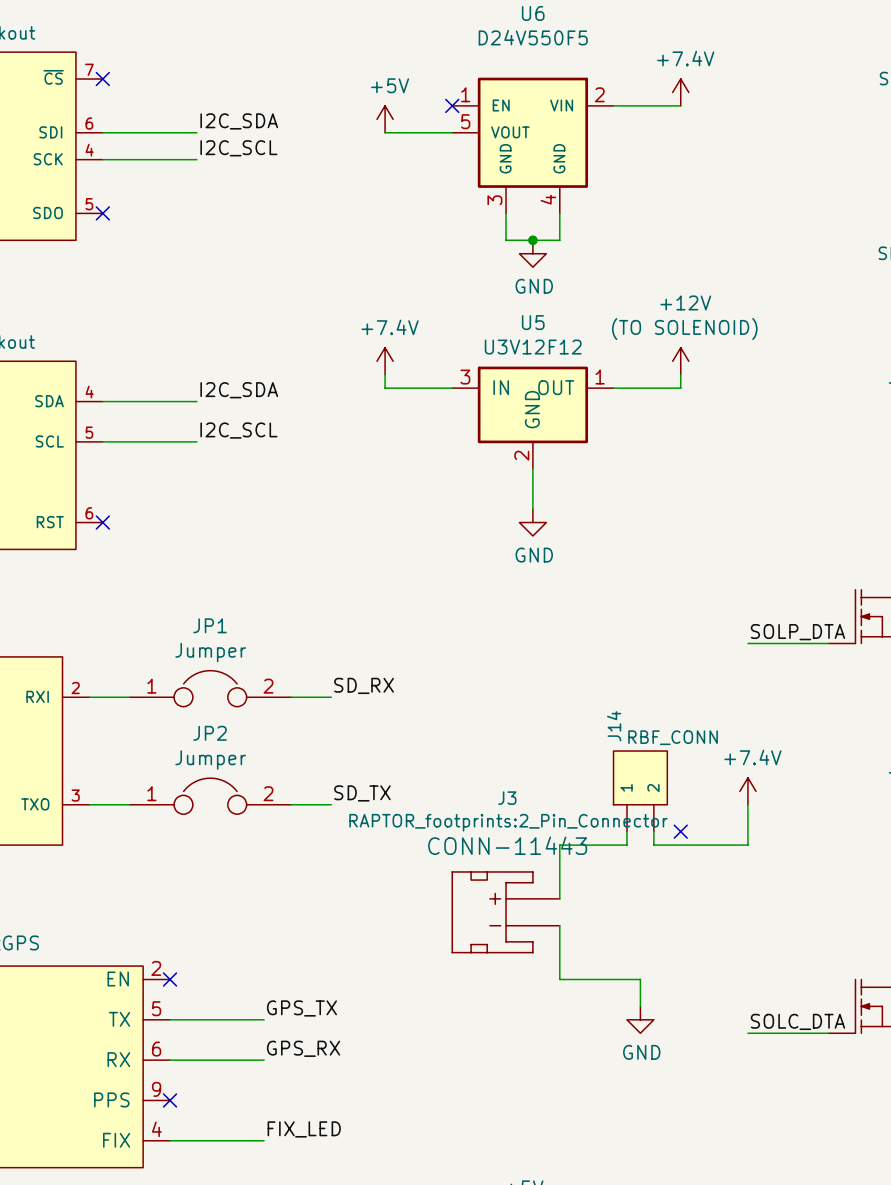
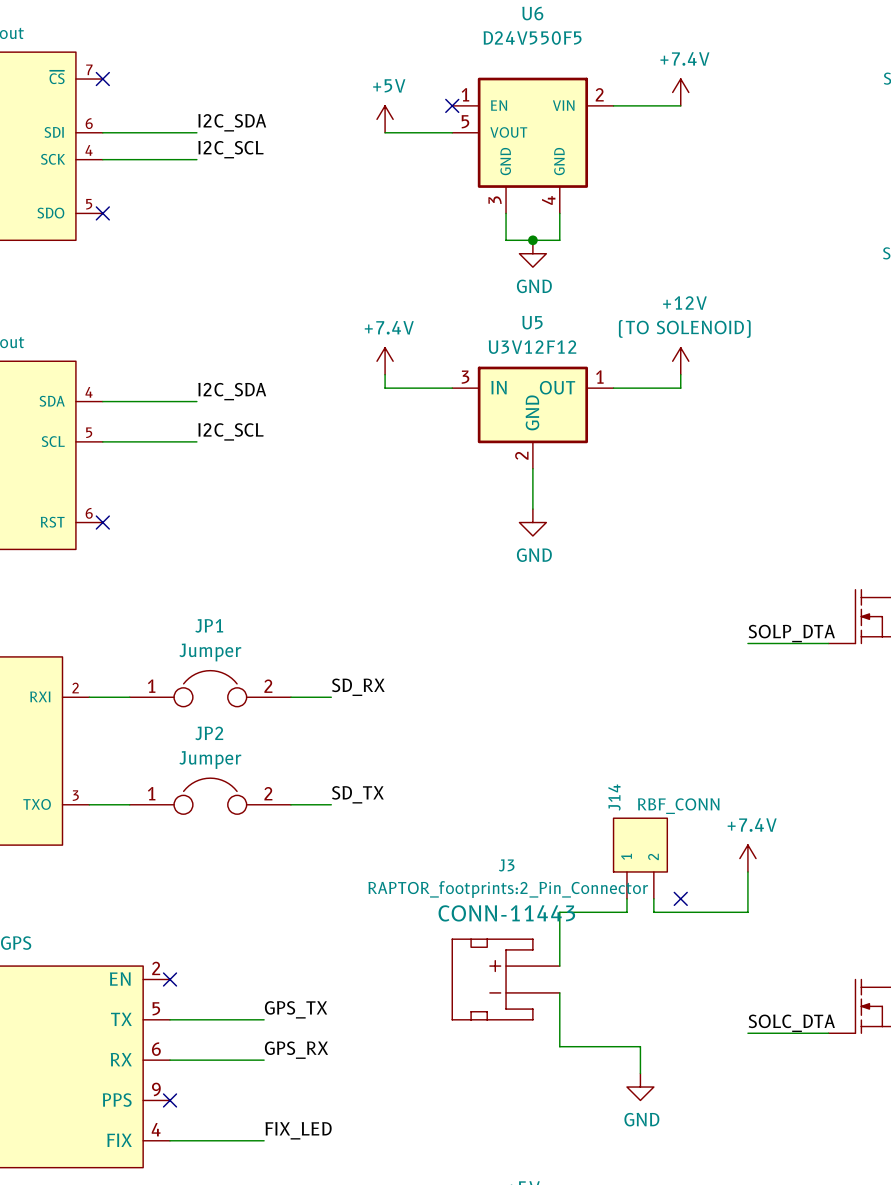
J14 position: (640, 791) -> (640, 858)
power symbol position: (747, 791) -> (747, 858)
wire: (747, 804) (747, 845) (653, 845) (653, 831) -> (747, 871) (747, 912) (653, 912) (653, 898)
wire: (626, 831) (626, 845) (559, 845) (559, 898) -> none
no-connect mark: (680, 831) -> none
wire: none -> (626, 898) (626, 912) (559, 912) (559, 925)
no-connect mark: none -> (680, 898)
J3 position: (506, 912) -> (506, 979)
wire: (559, 966) (559, 979) (640, 979) (640, 1006) -> none
wire: none -> (559, 992) (559, 1046) (640, 1046) (640, 1073)
power symbol position: GND (640, 1019) -> GND (640, 1087)

